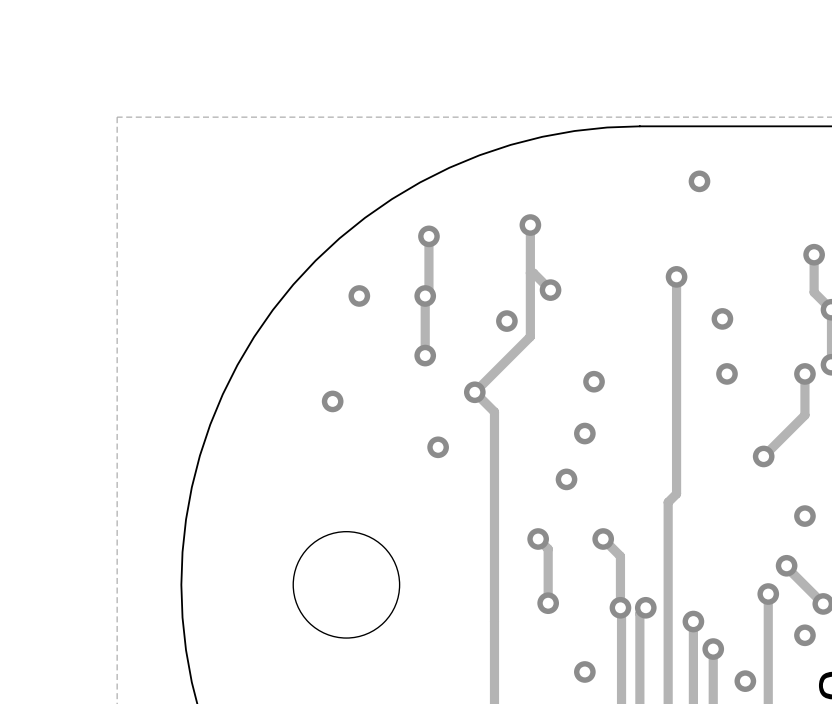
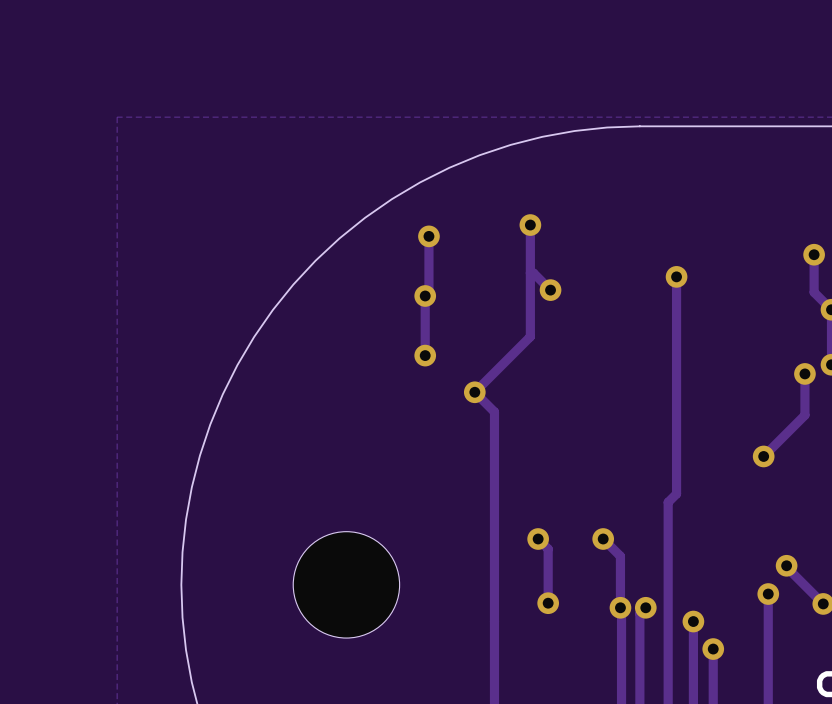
via: (699, 181) -> none
via: (359, 295) -> none
via: (722, 318) -> none
via: (506, 321) -> none
via: (727, 373) -> none
via: (594, 381) -> none
via: (332, 401) -> none
via: (584, 433) -> none
via: (438, 447) -> none
via: (566, 479) -> none
via: (804, 516) -> none
via: (804, 635) -> none
via: (584, 671) -> none
via: (745, 681) -> none

